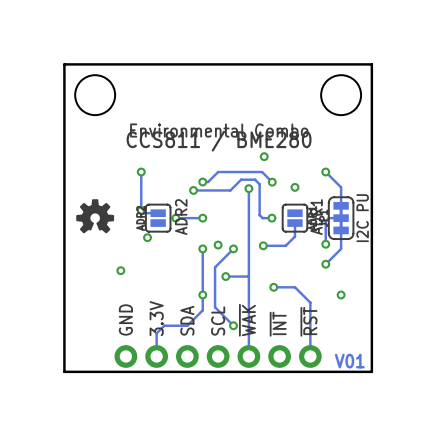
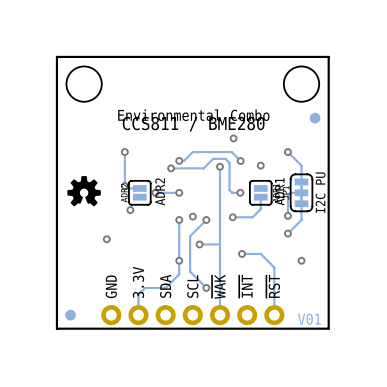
part: none -> (315, 118)
part: none -> (70, 315)

